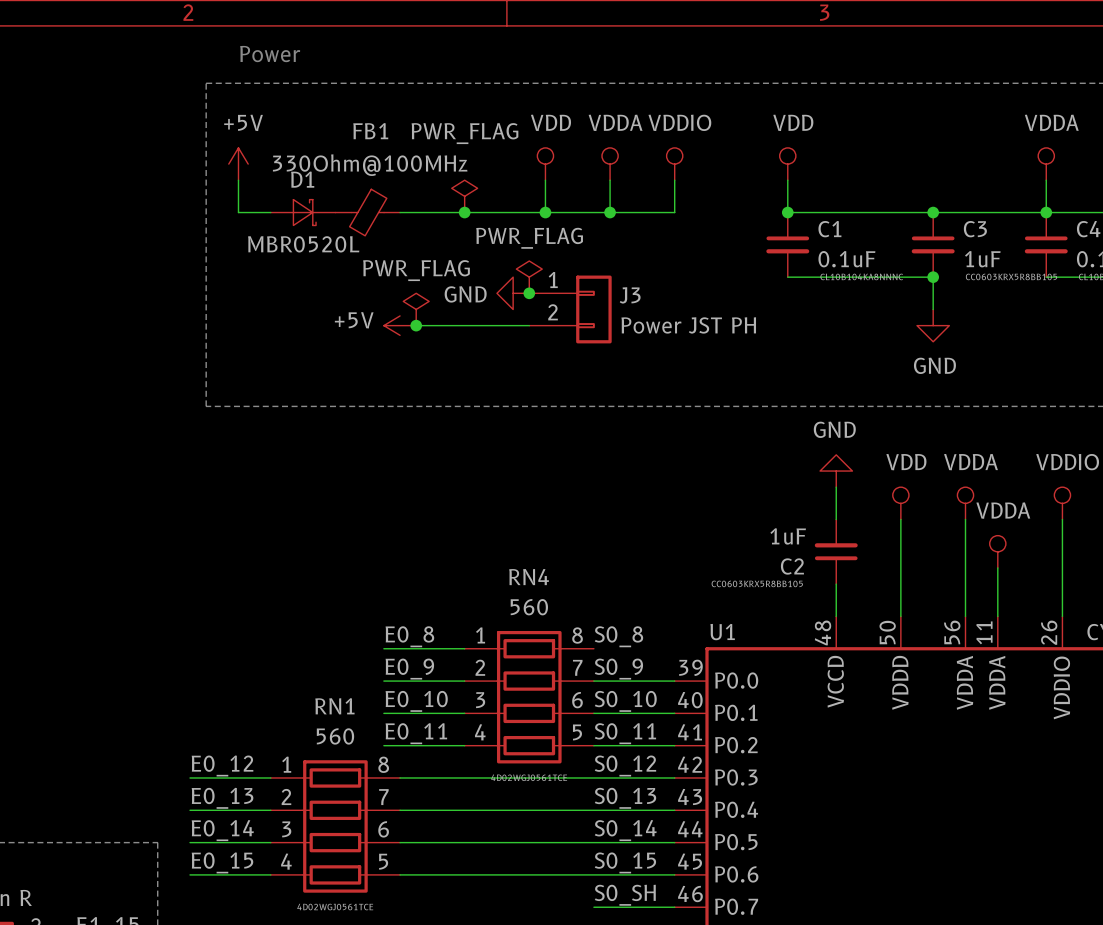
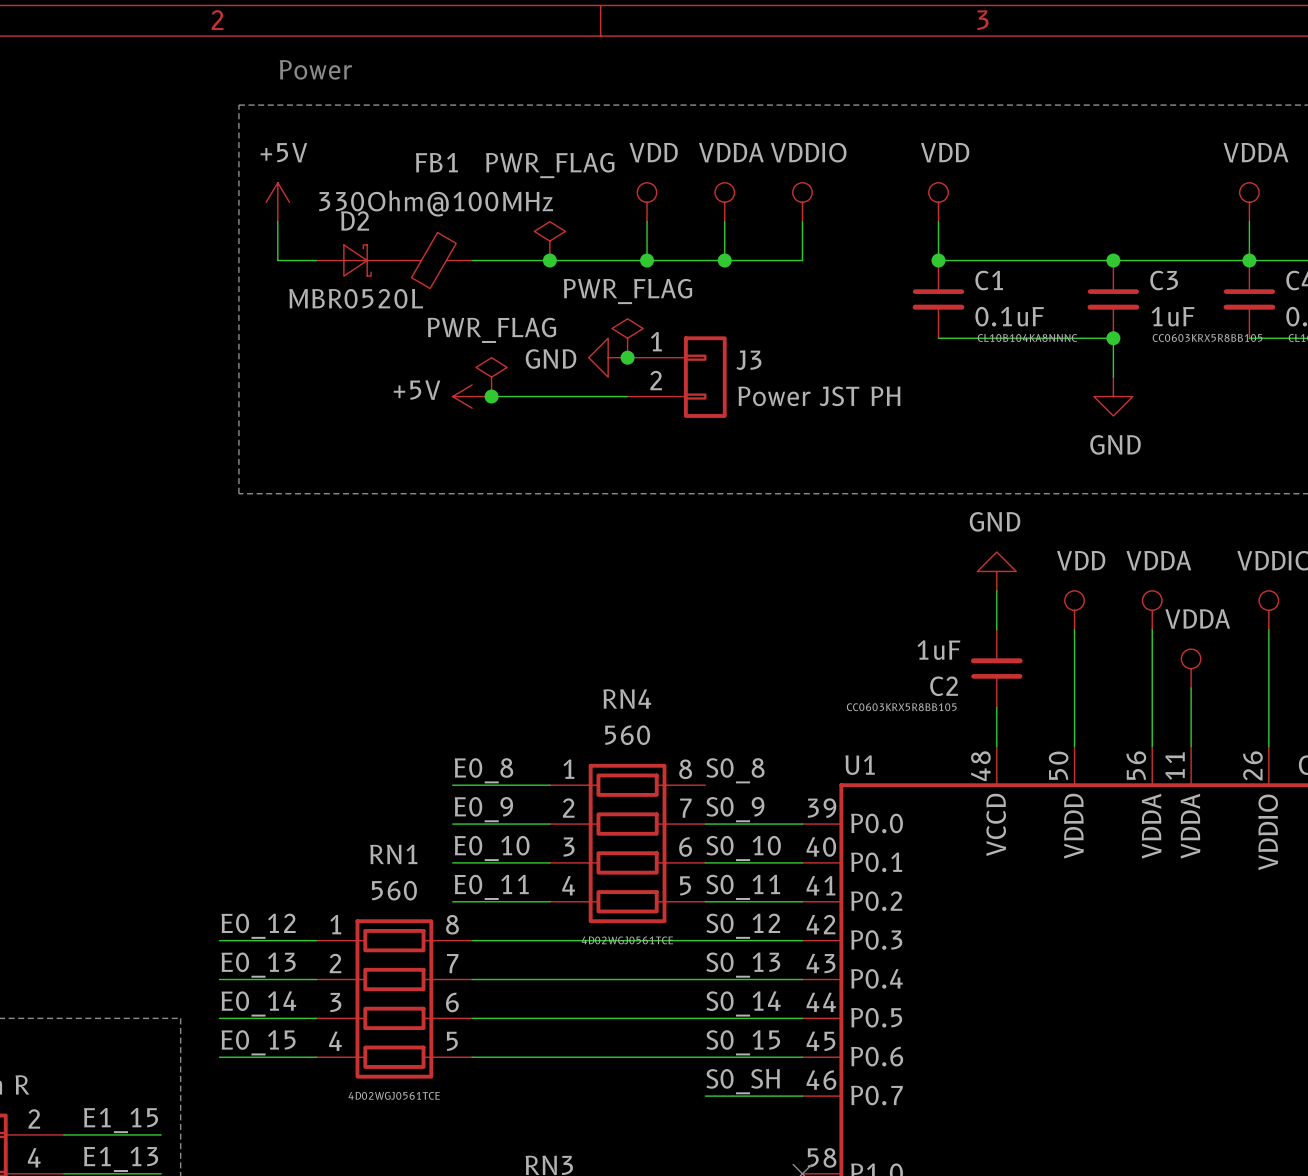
D1 name: D1 (302, 179) -> D2 (355, 220)

